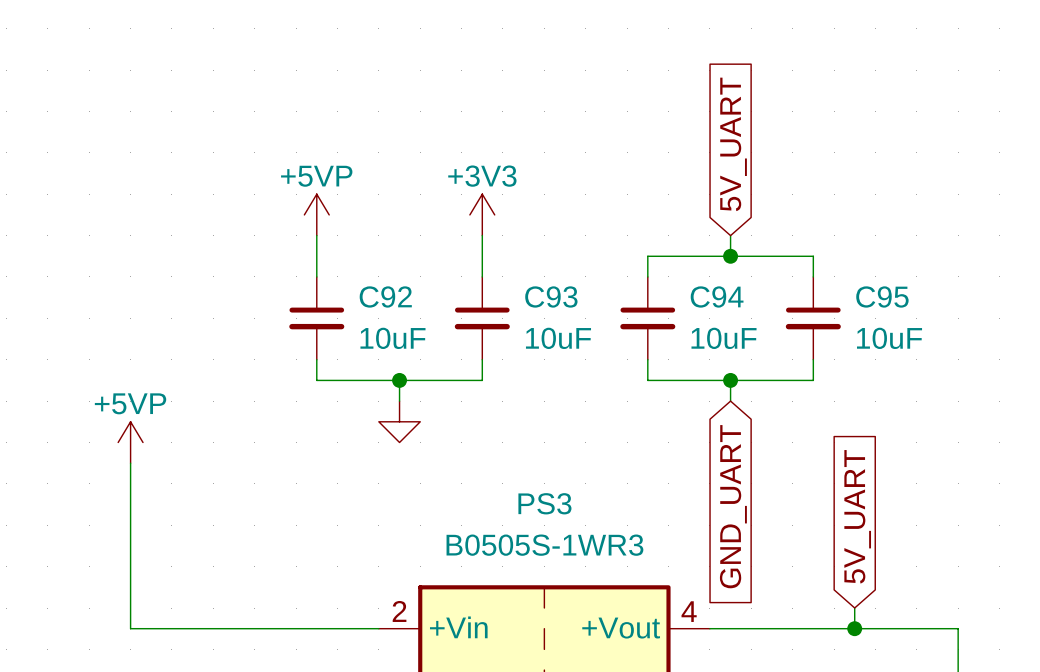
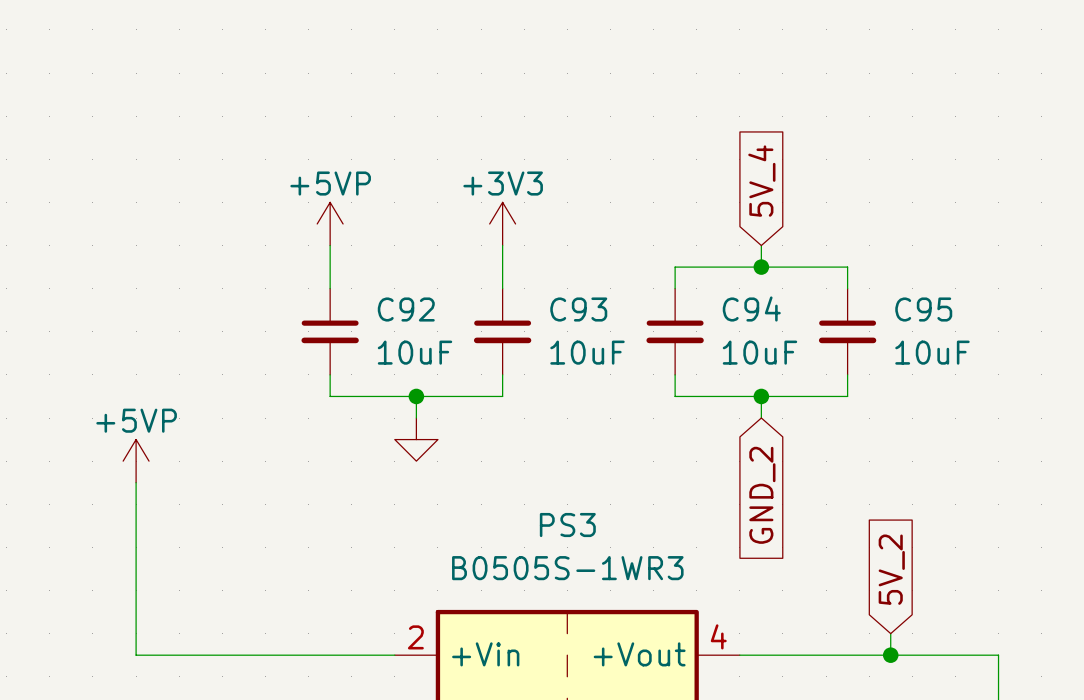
global label: 5V_UART (733, 144) -> 5V_4 (761, 181)
global label: GND_UART (733, 506) -> GND_2 (762, 495)
global label: 5V_UART (857, 516) -> 5V_2 (891, 569)

